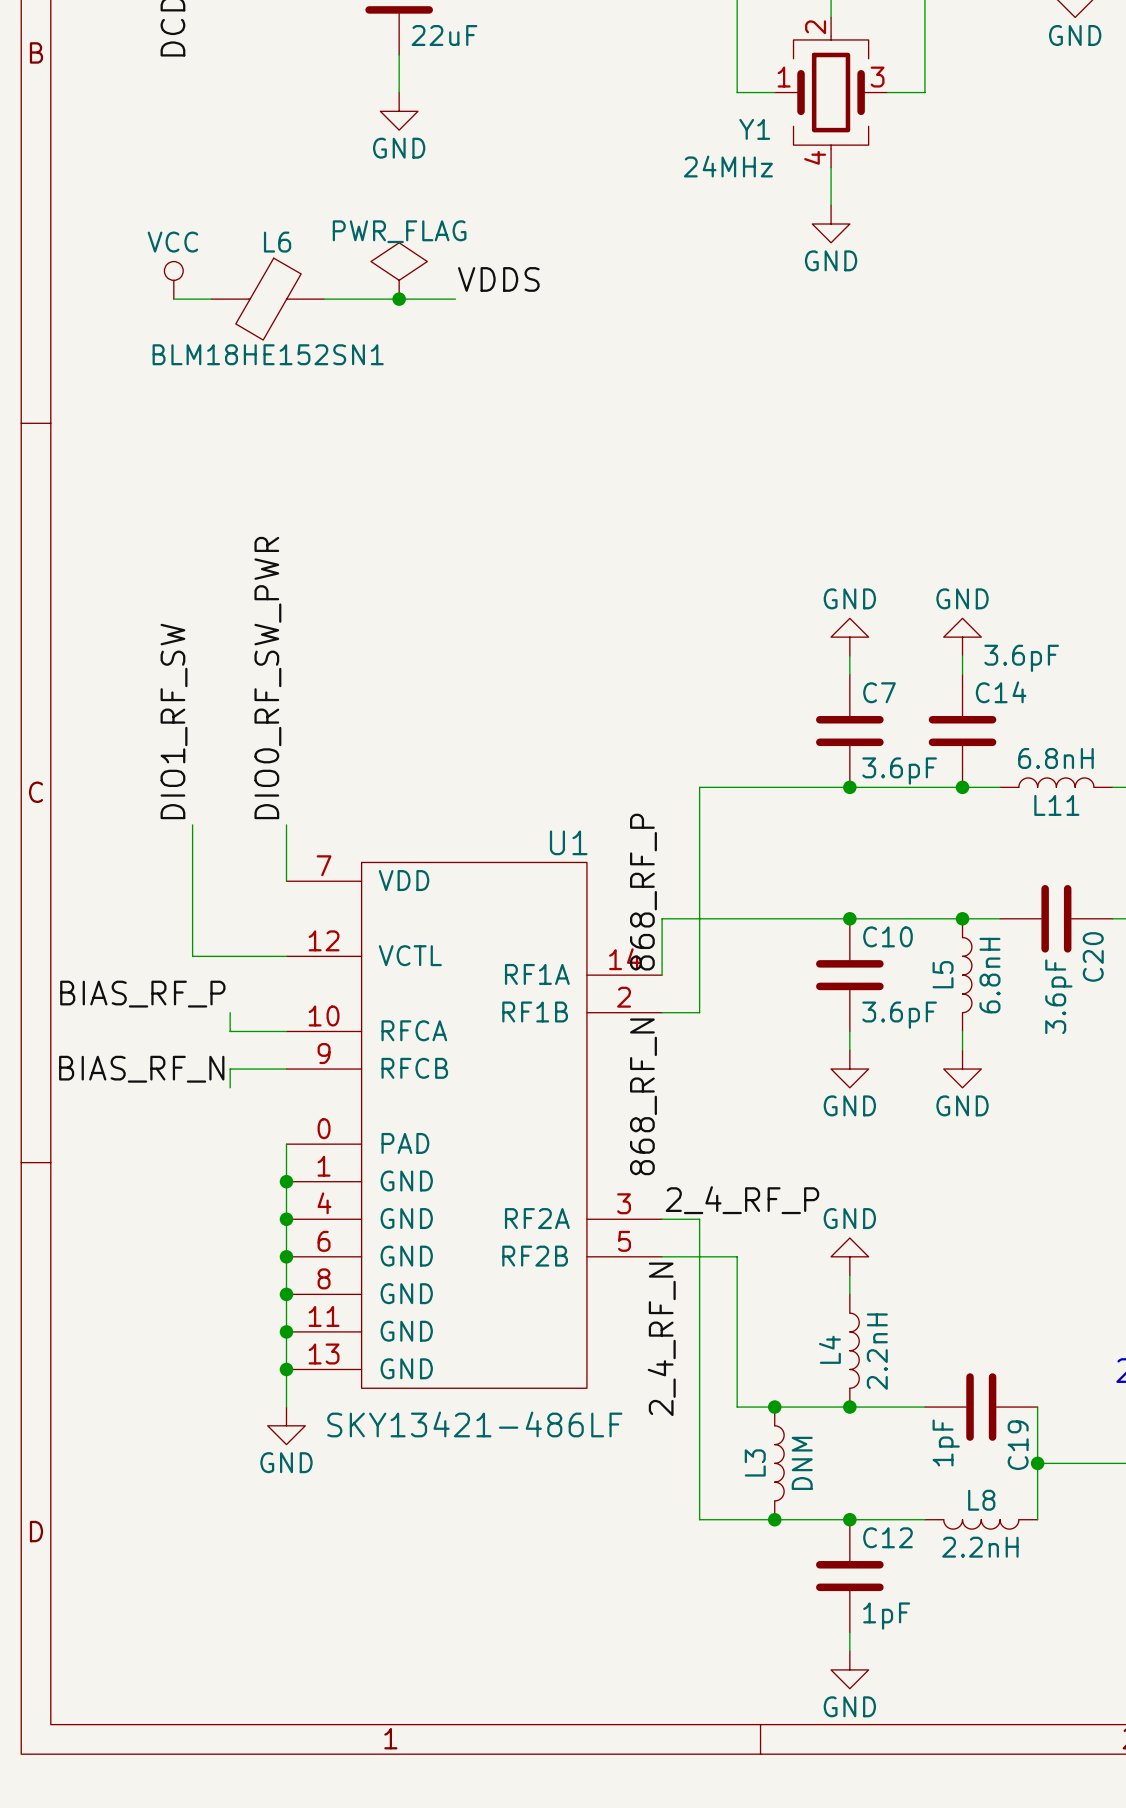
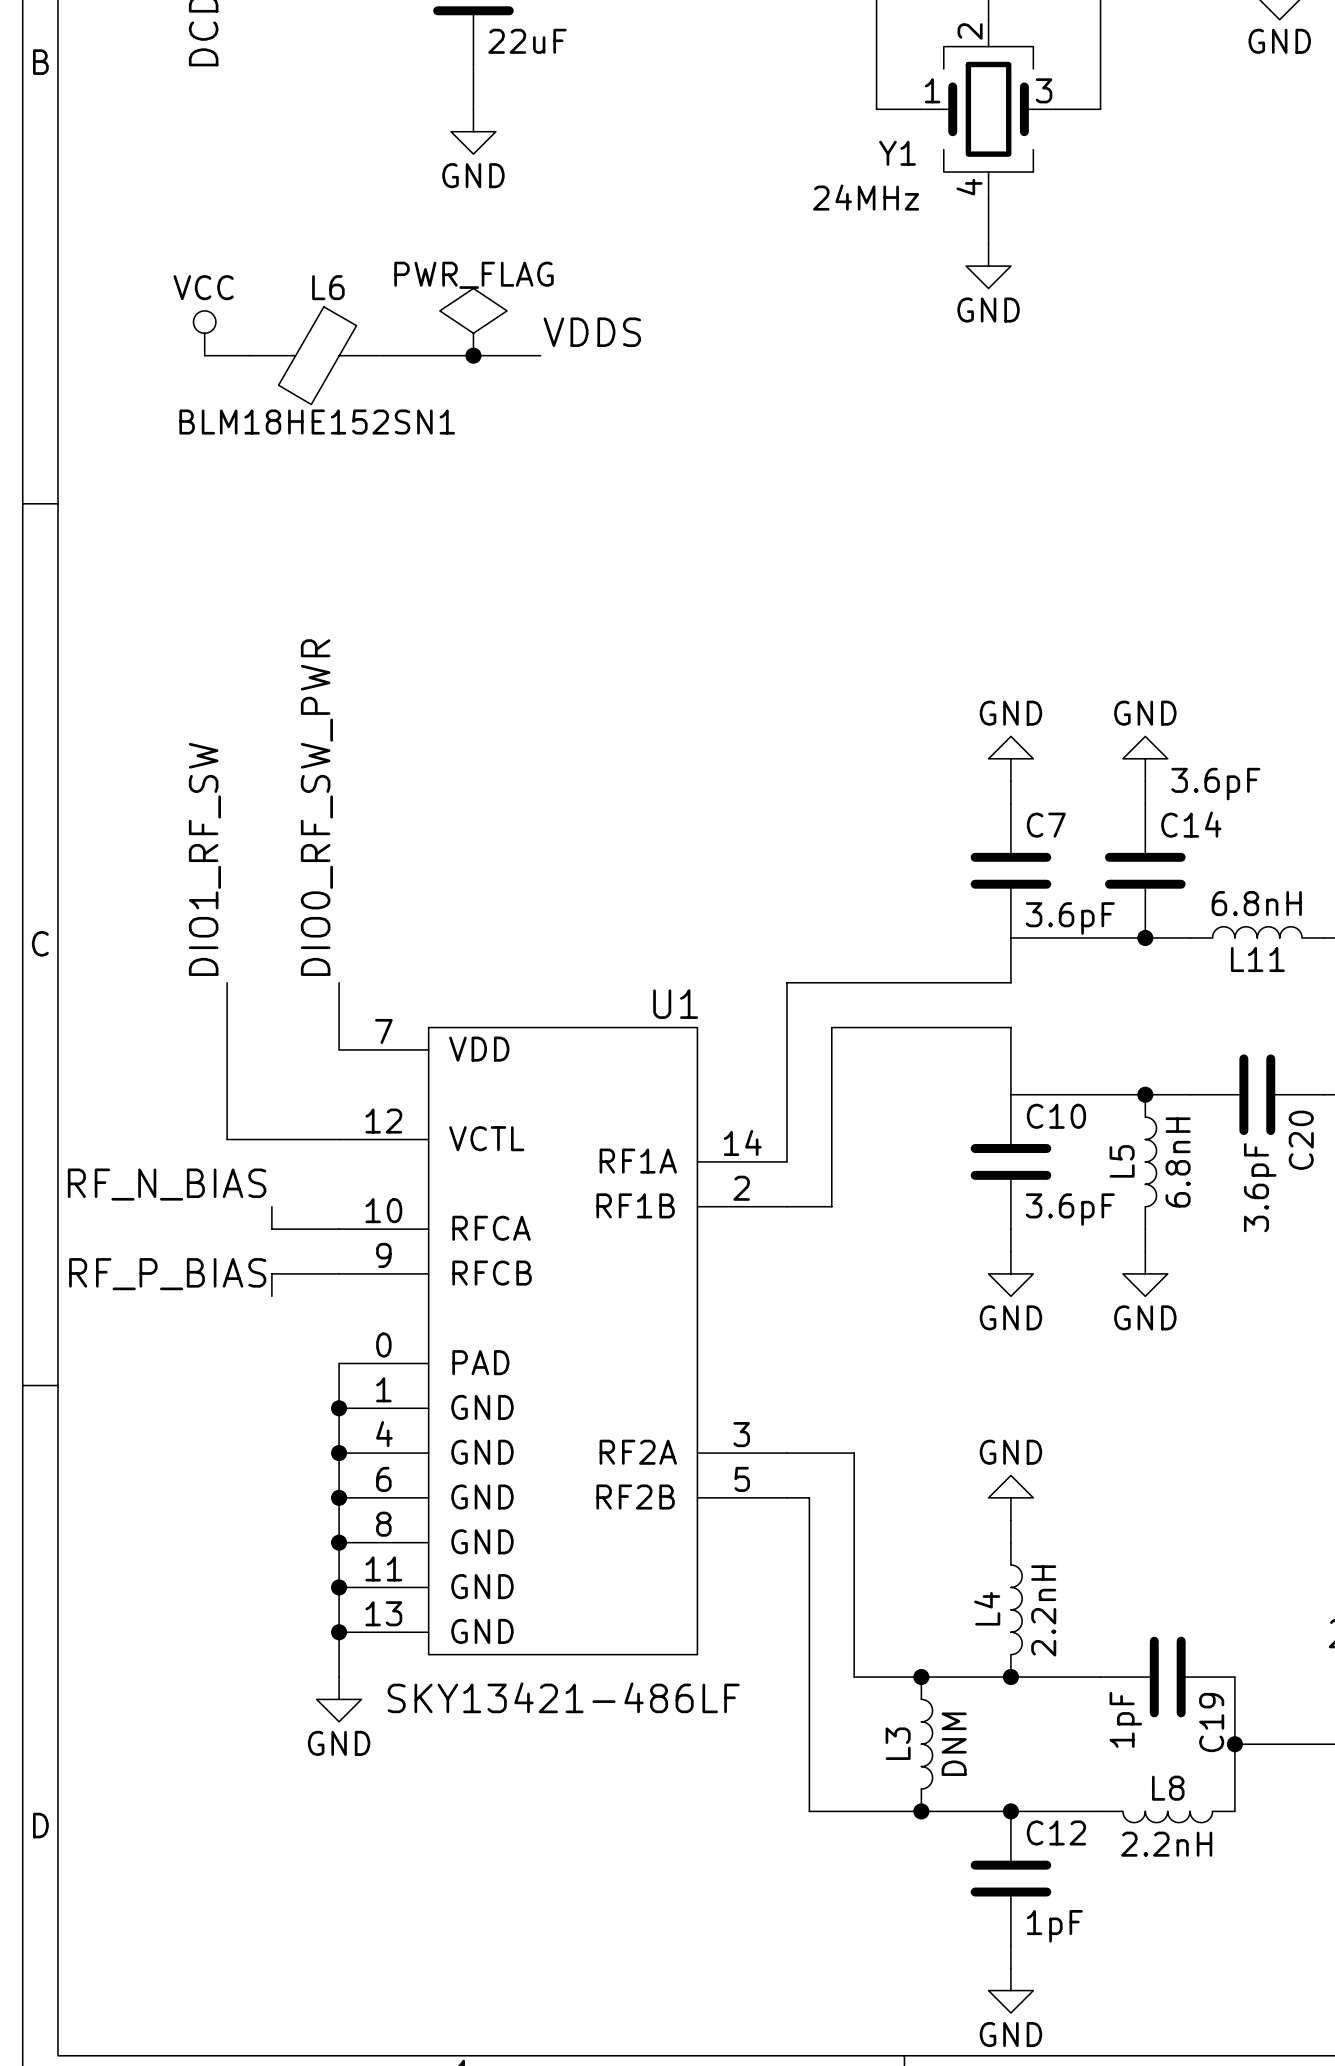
wire: (849, 787) (699, 787) (699, 862) -> (1010, 937) (1010, 982) (786, 982) (786, 1094)
junction: (849, 787) -> none
label: 868_RF_P (643, 892) -> none
wire: (662, 918) (849, 918) -> (831, 1027) (1010, 1027) (1010, 1094)
junction: (849, 918) -> none
label: BIAS_RF_P (142, 994) -> RF_N_BIAS (167, 1184)
label: BIAS_RF_N (141, 1069) -> RF_P_BIAS (167, 1274)
label: 868_RF_N (643, 1096) -> none
label: 2_4_RF_P (742, 1200) -> none
wire: (699, 1219) (699, 1519) -> (809, 1497) (809, 1811) (831, 1811)
wire: (680, 1256) (737, 1256) (737, 1407) -> (831, 1453) (854, 1453) (854, 1677) (876, 1677)
label: 2_4_RF_N (661, 1339) -> none

